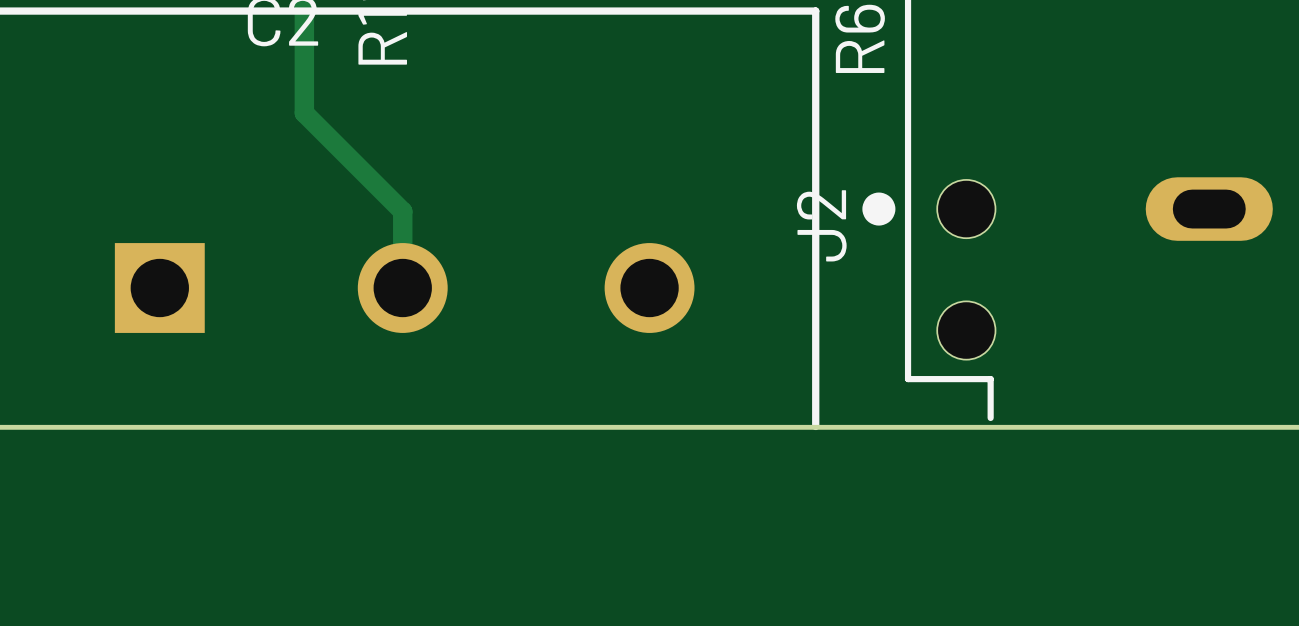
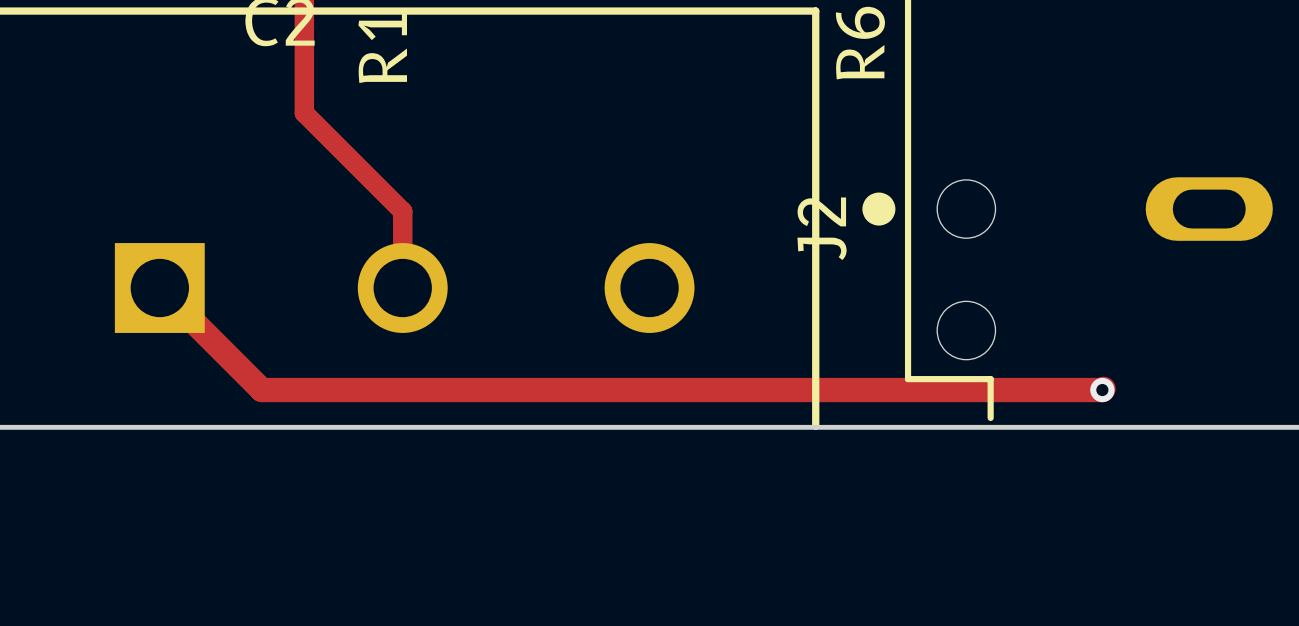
track: none -> (159, 288) (261, 390) (1103, 388)
via: none -> (1102, 390)

